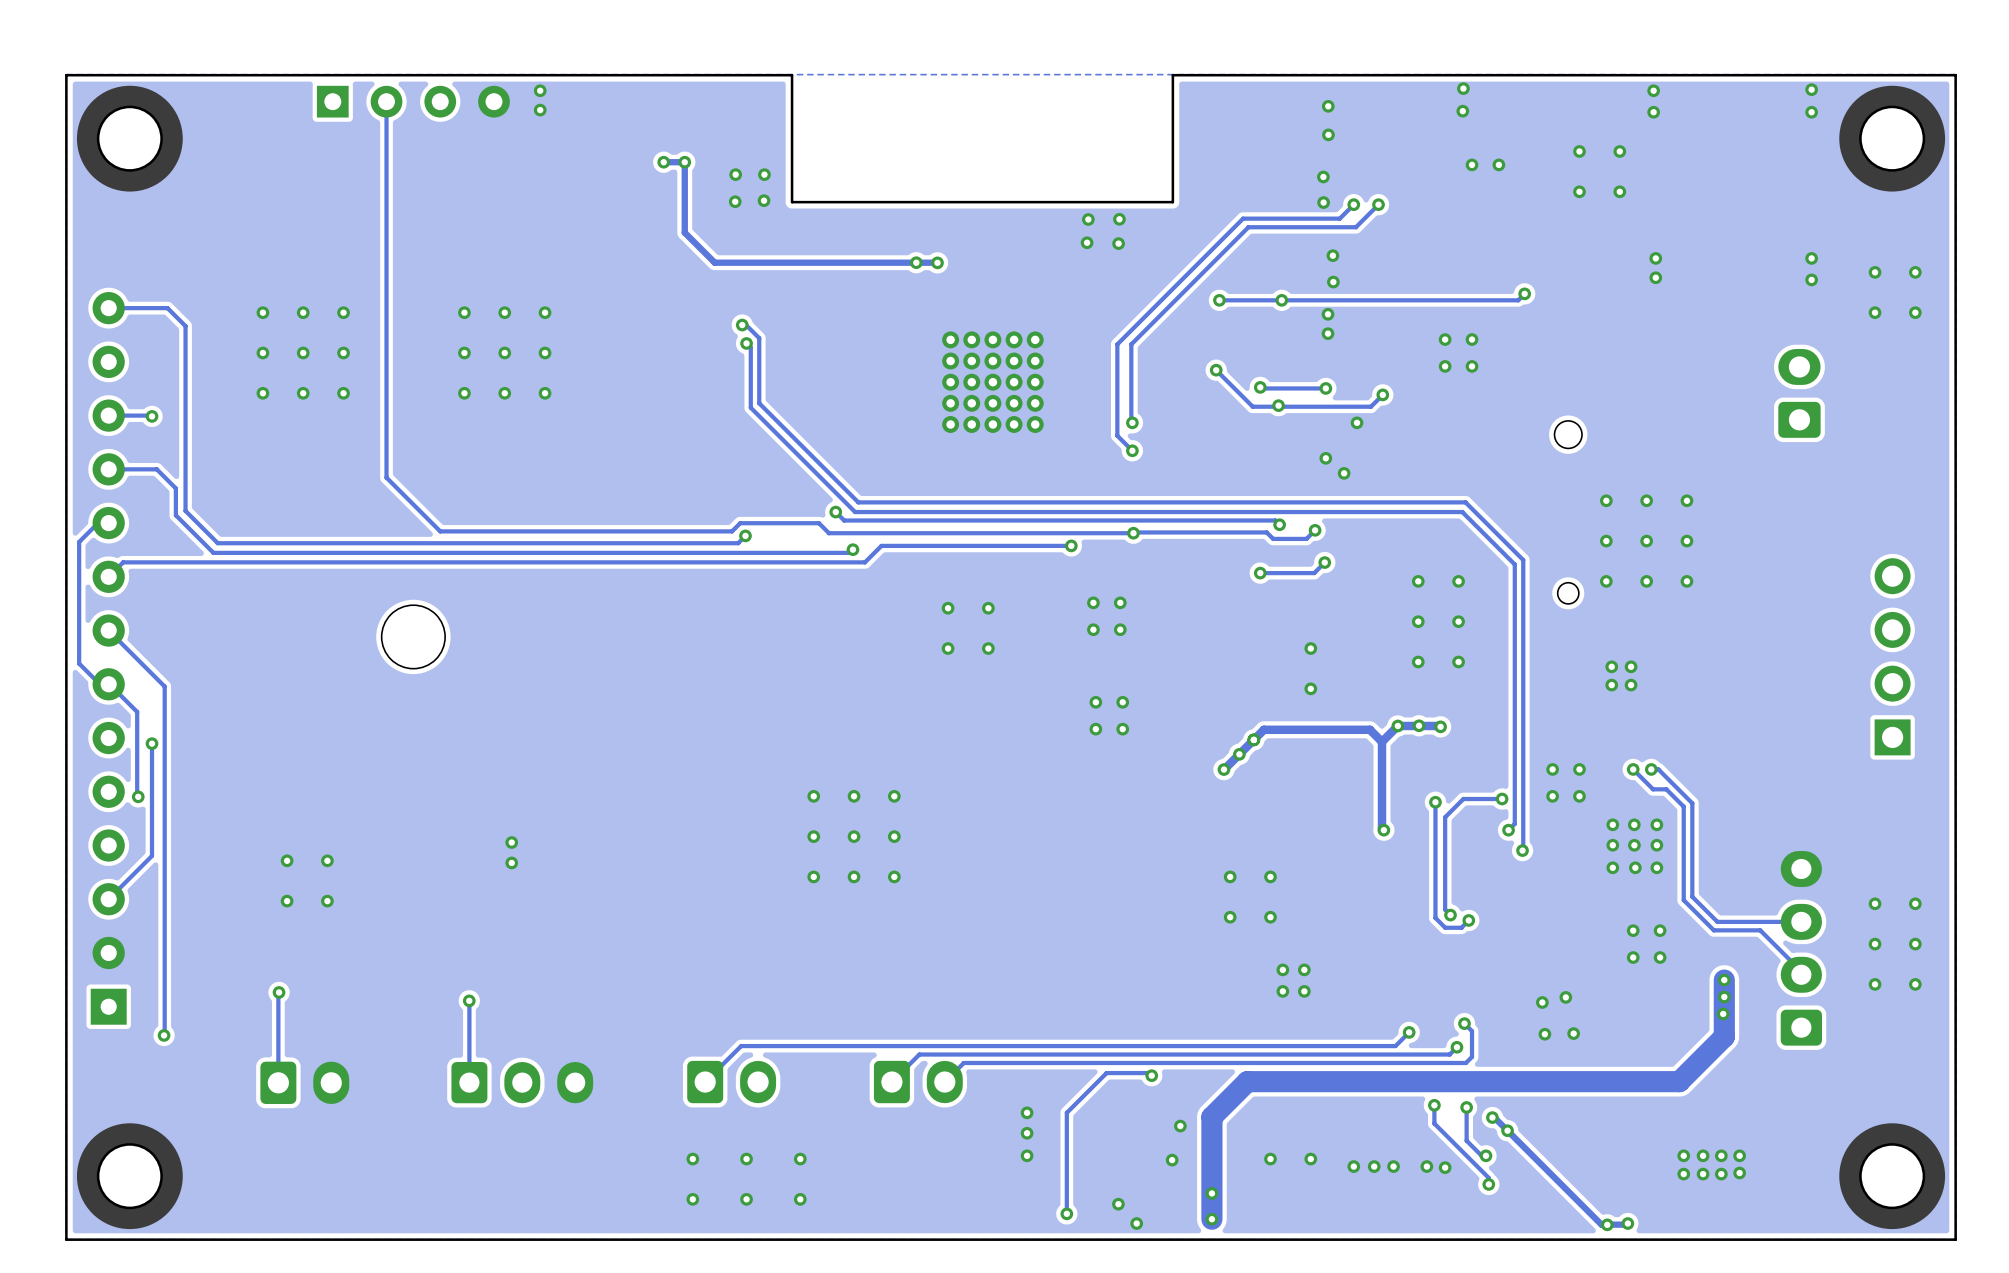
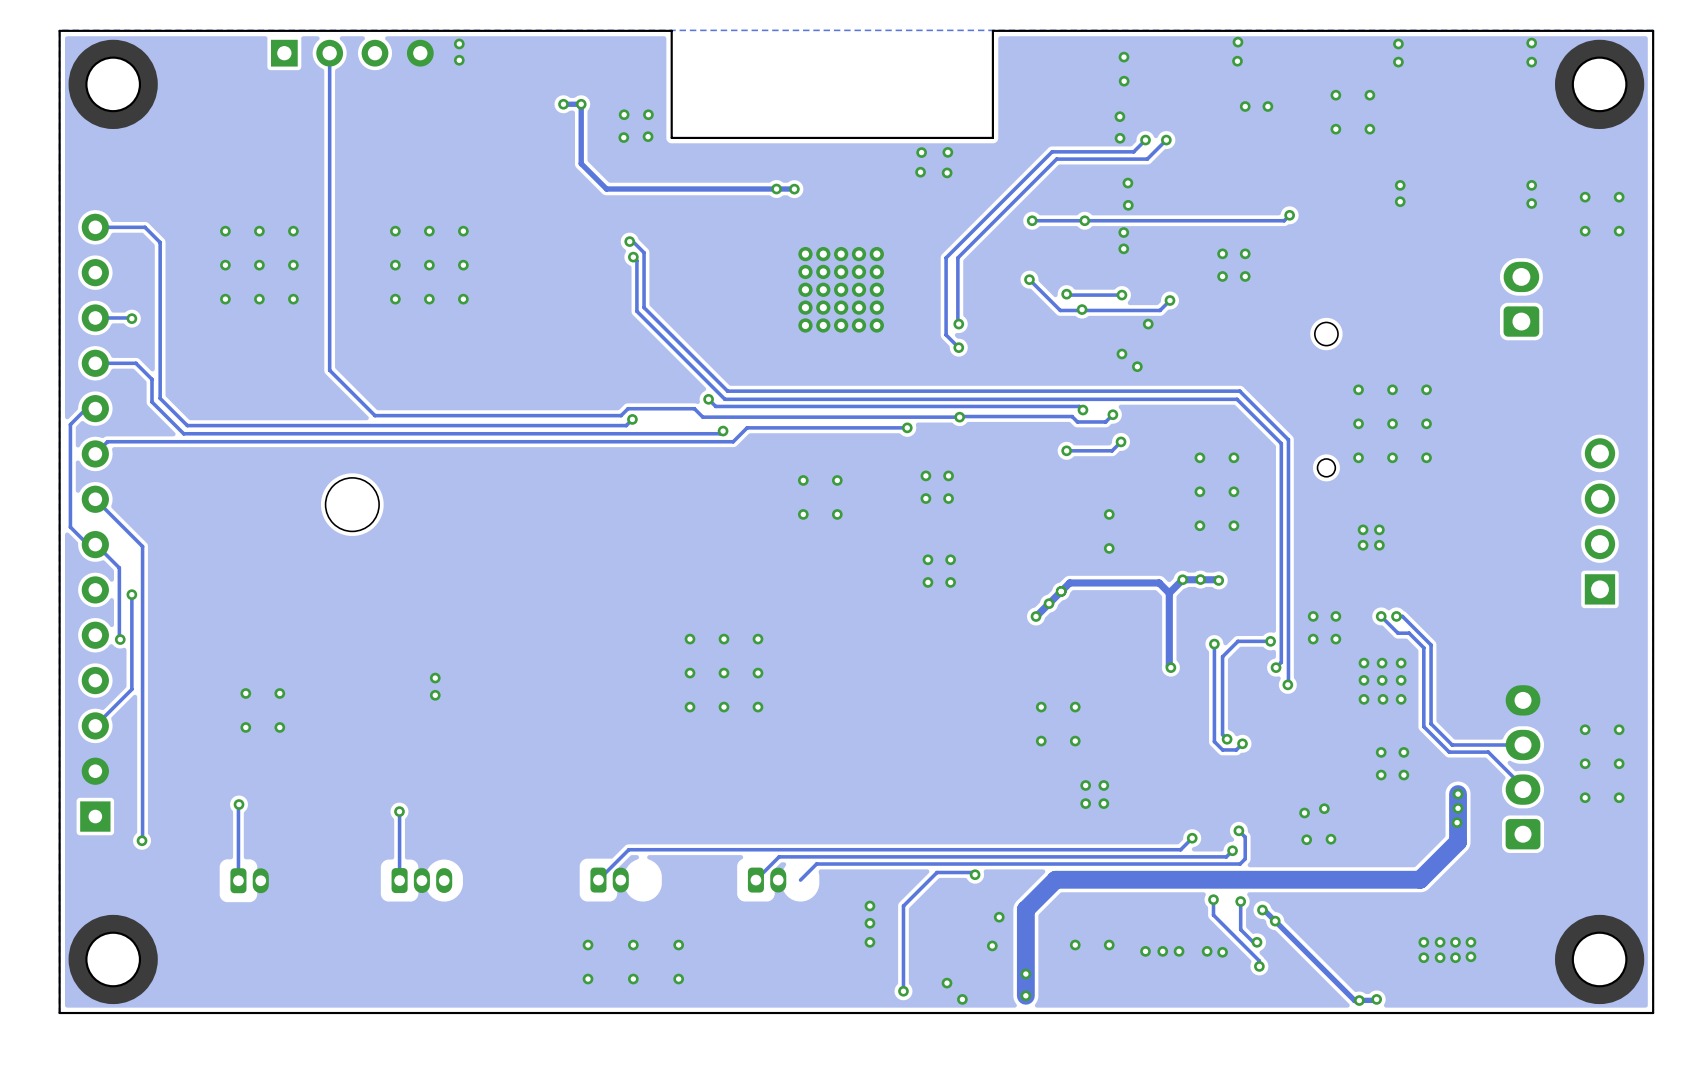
part footprint: [687, 1060, 777, 1104] -> [590, 867, 629, 893]
part footprint: [873, 1060, 963, 1104] -> [747, 867, 787, 893]
part footprint: [260, 1061, 350, 1104] -> [230, 868, 269, 894]
part: none -> (421, 880)
part: (522, 1082) -> none

